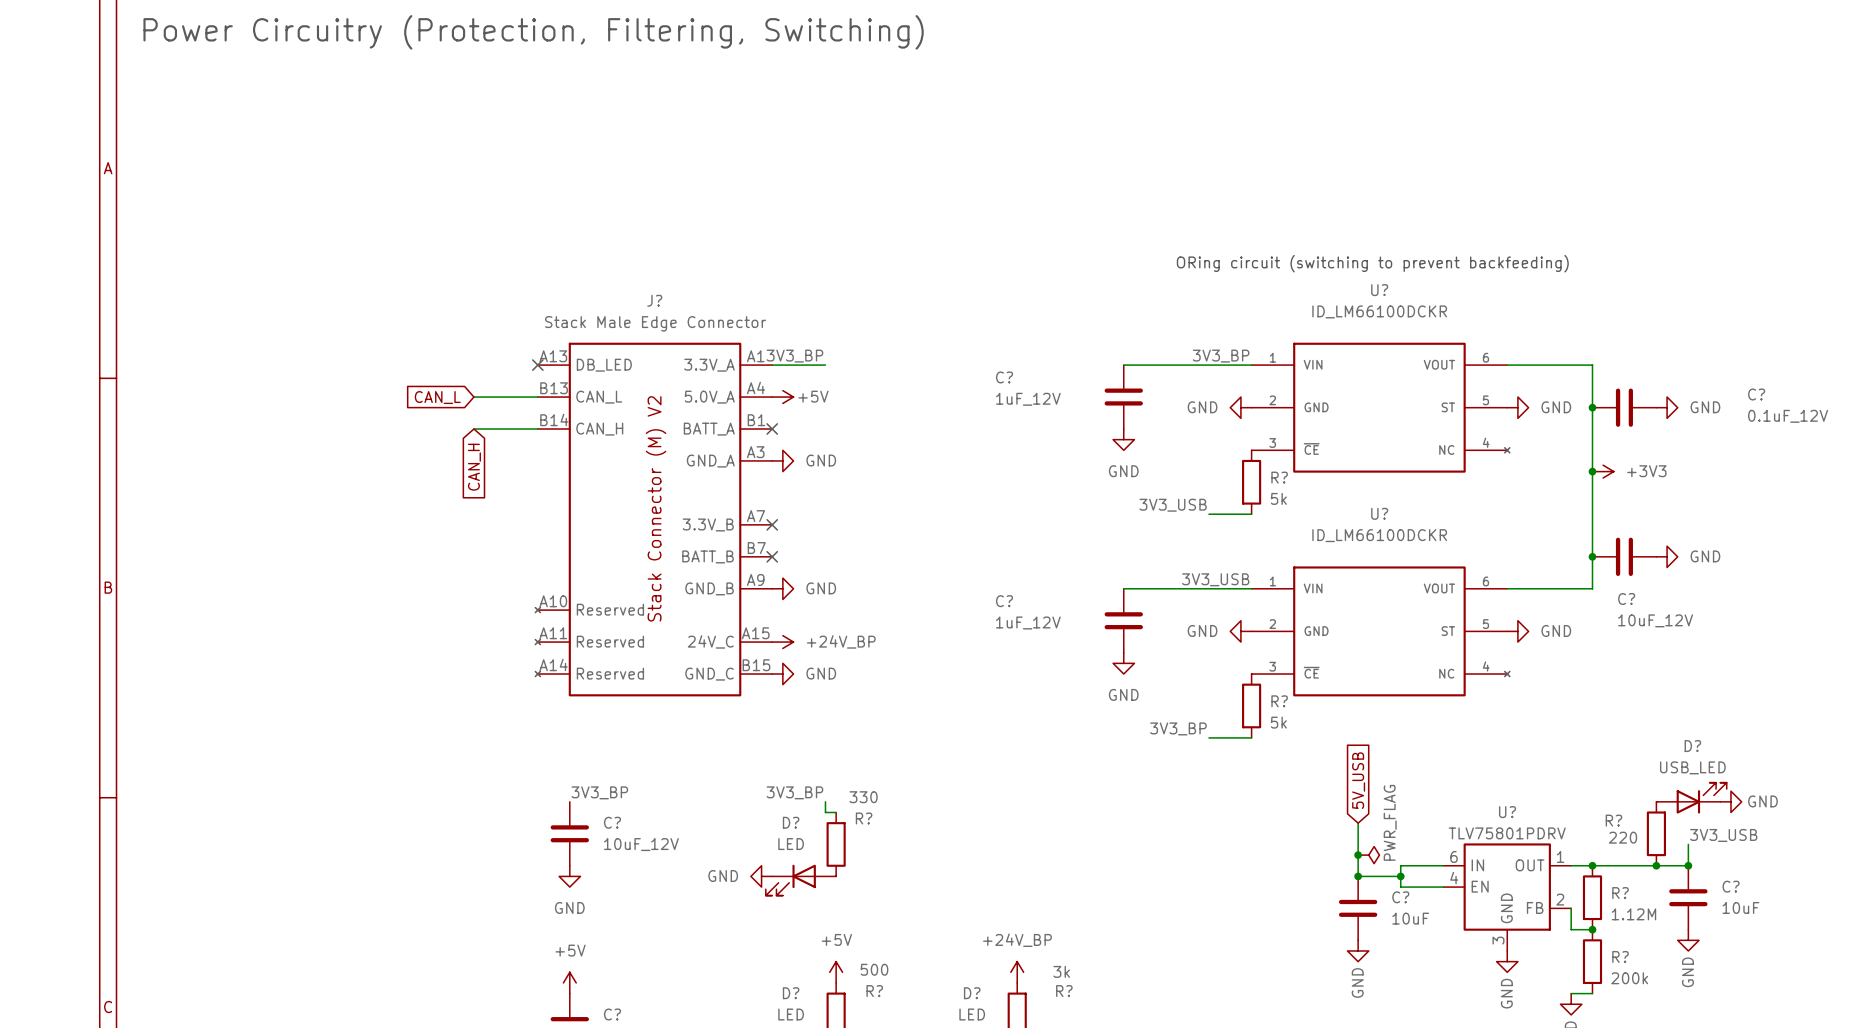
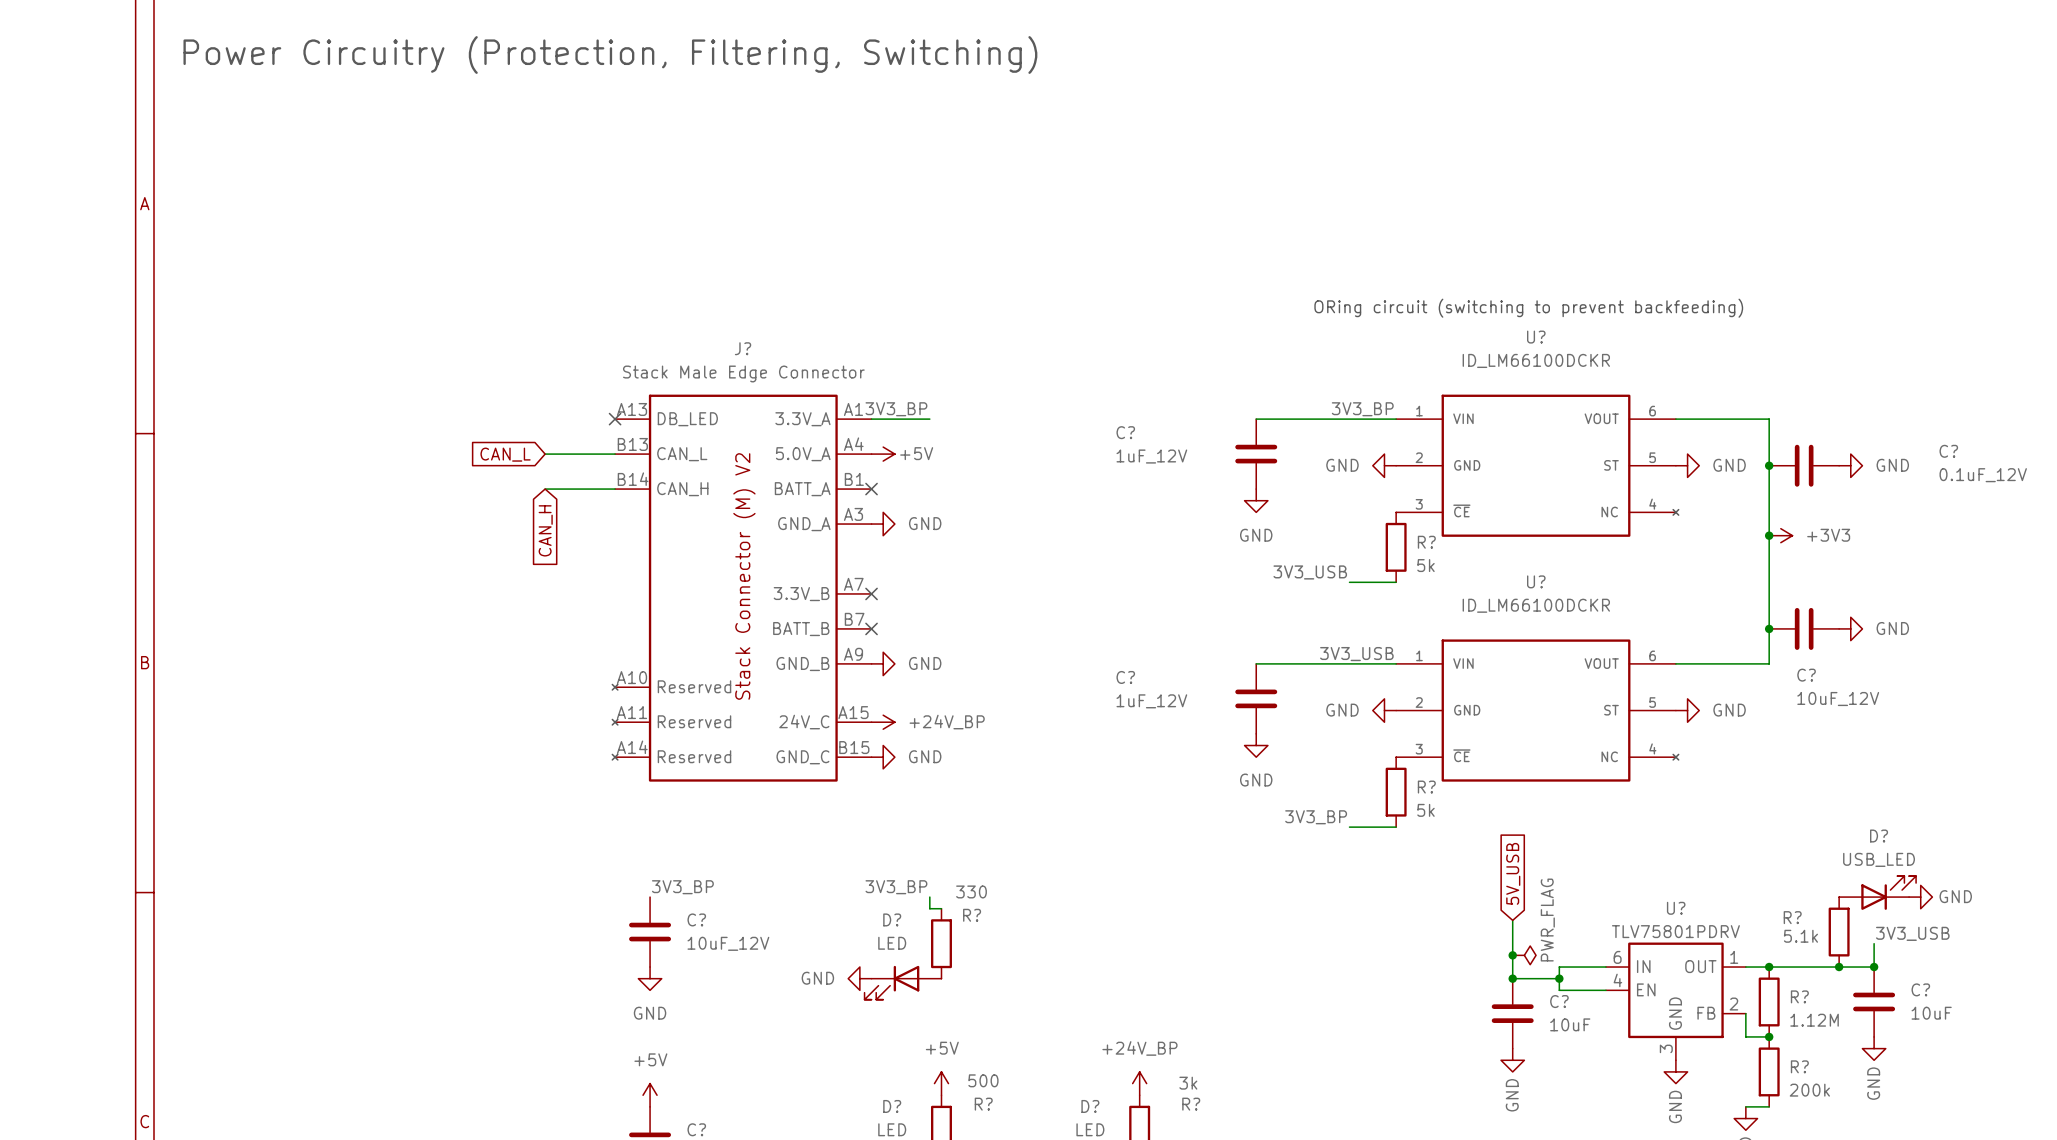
R? value: 220 (1623, 837) -> 5.1k (1800, 936)

